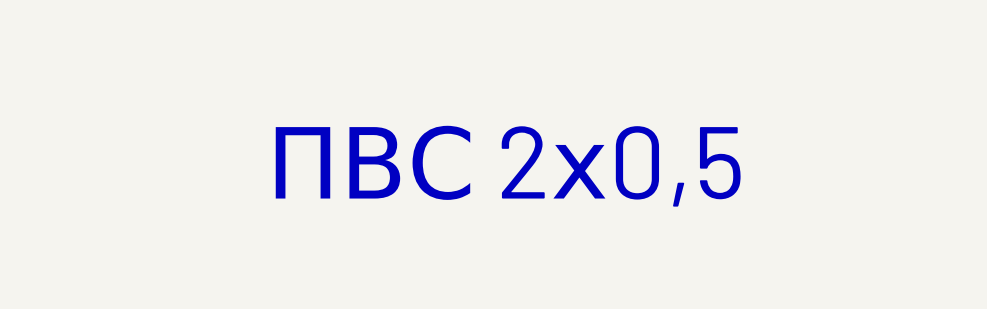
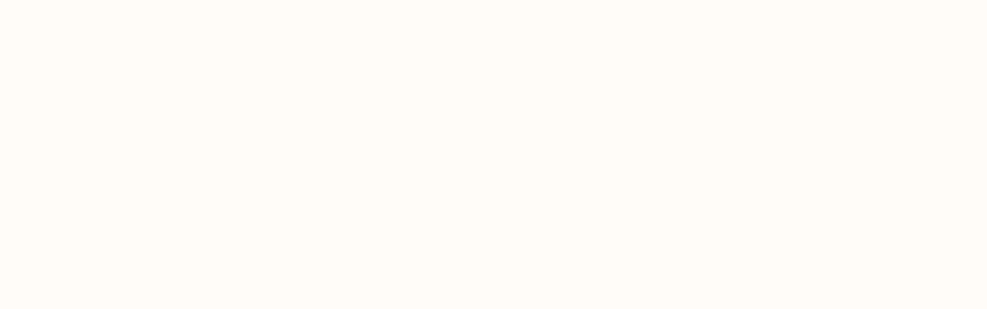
text: ПВС 2х0,5 (508, 166) -> none

